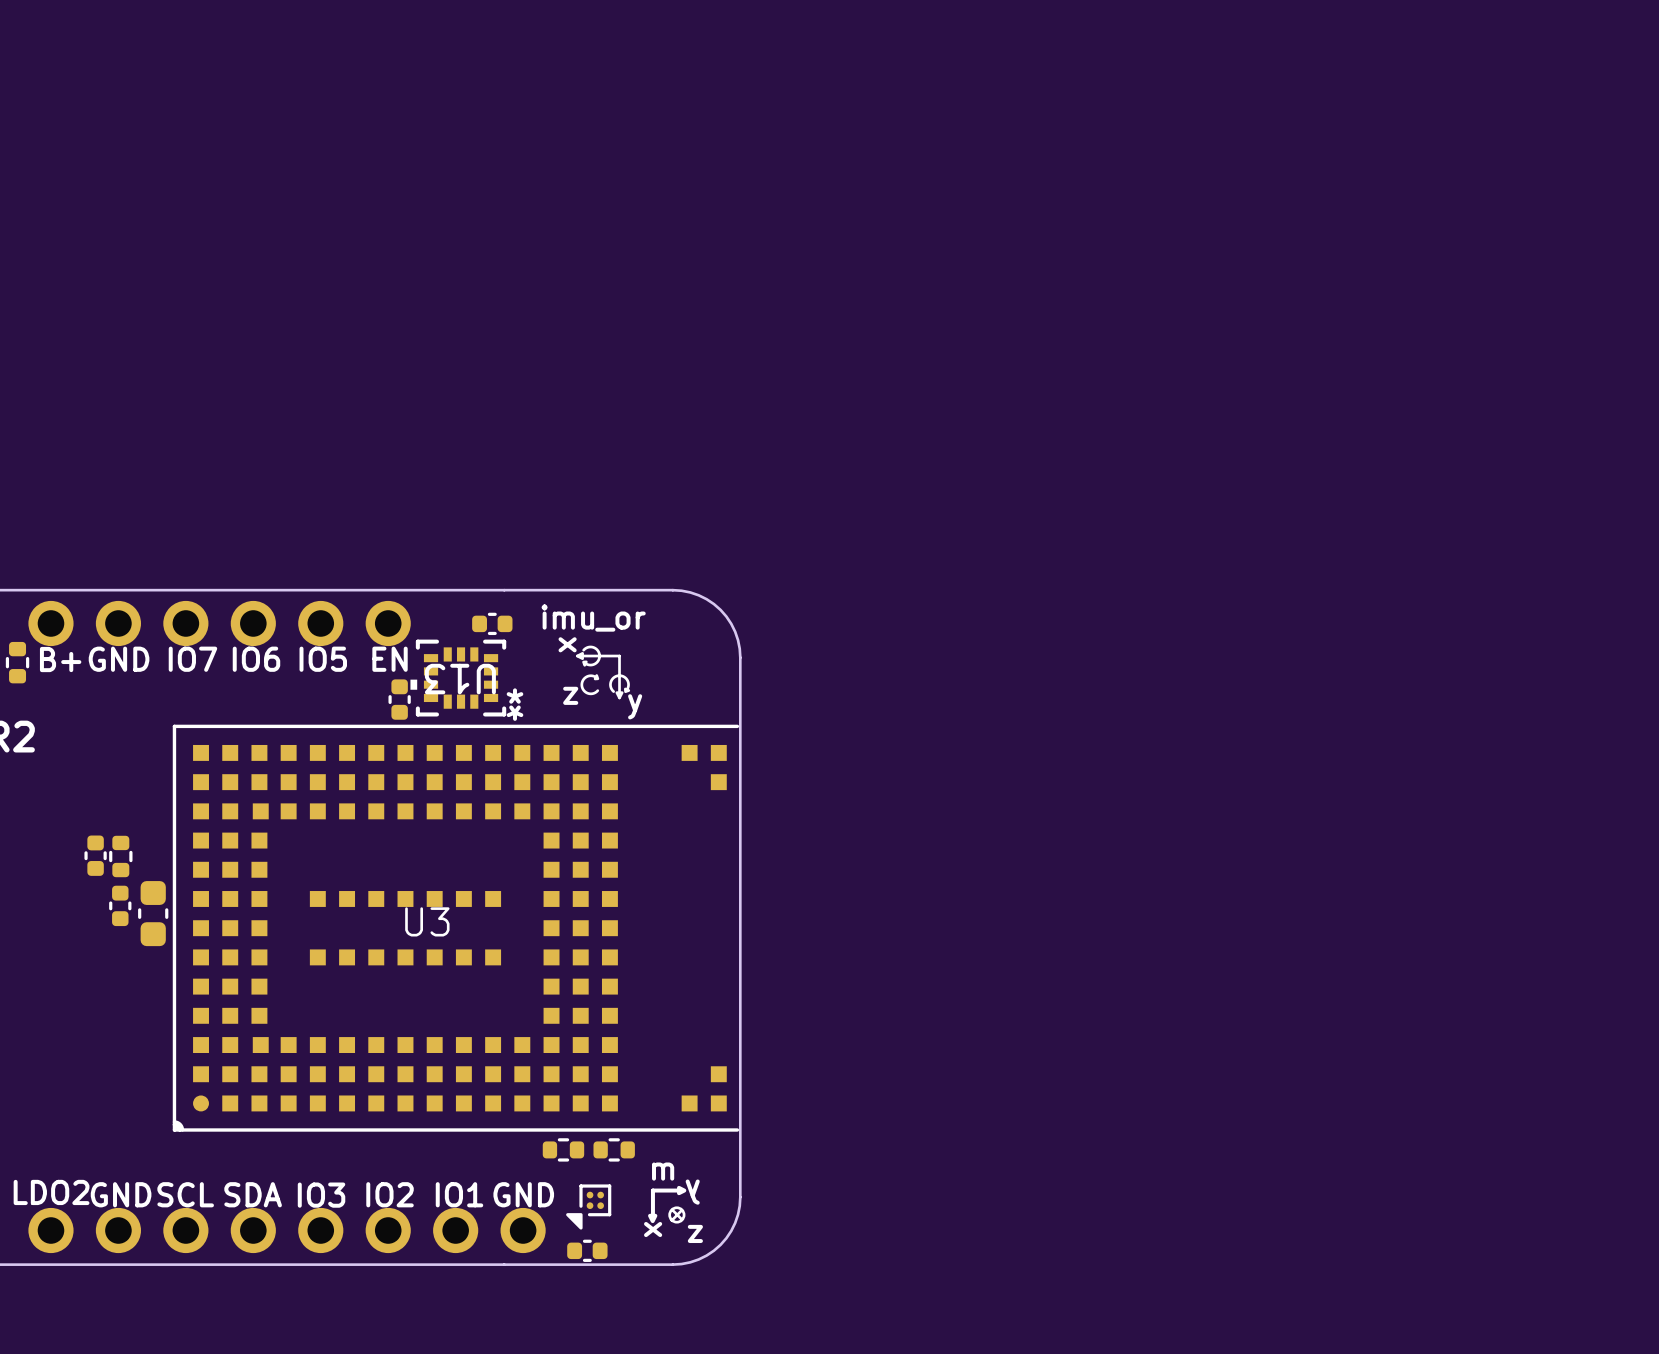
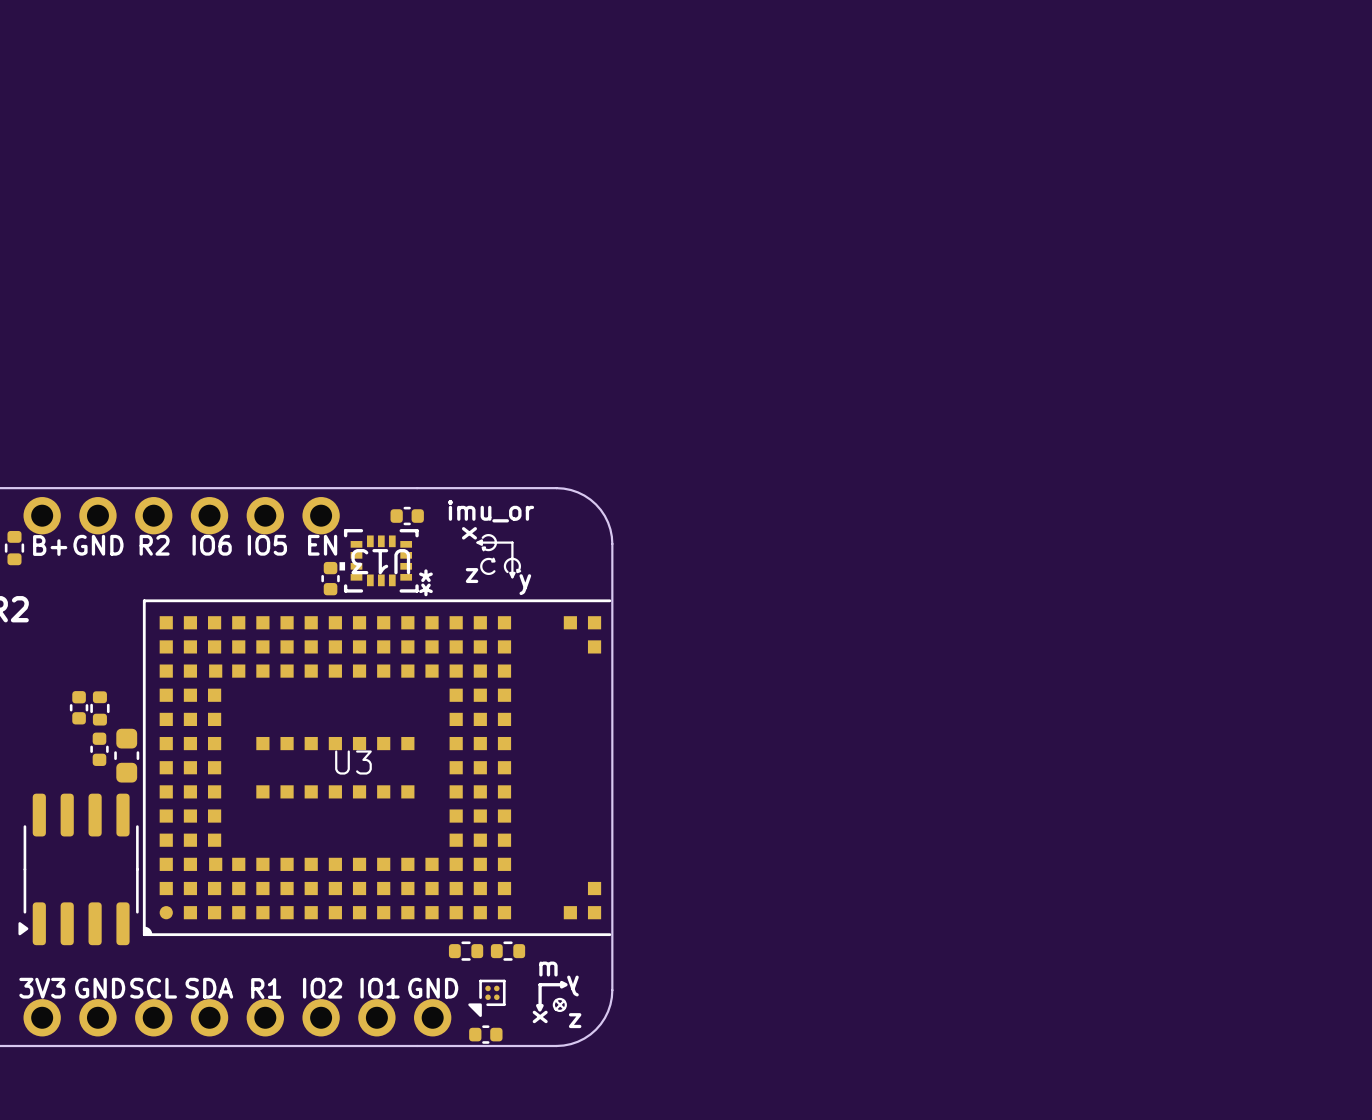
text: IO7 (192, 659) -> R2 (154, 545)
part: none -> (78, 869)
text: LDO2 (51, 1192) -> 3V3 (42, 988)
text: IO3 (321, 1195) -> R1 (266, 988)

